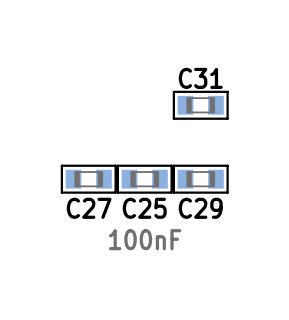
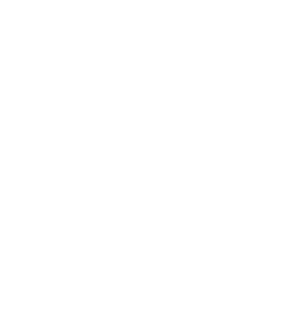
C31: (200, 105) -> none
C27: 100nF (88, 179) -> none
C25: (144, 179) -> none
C29: (200, 179) -> none

